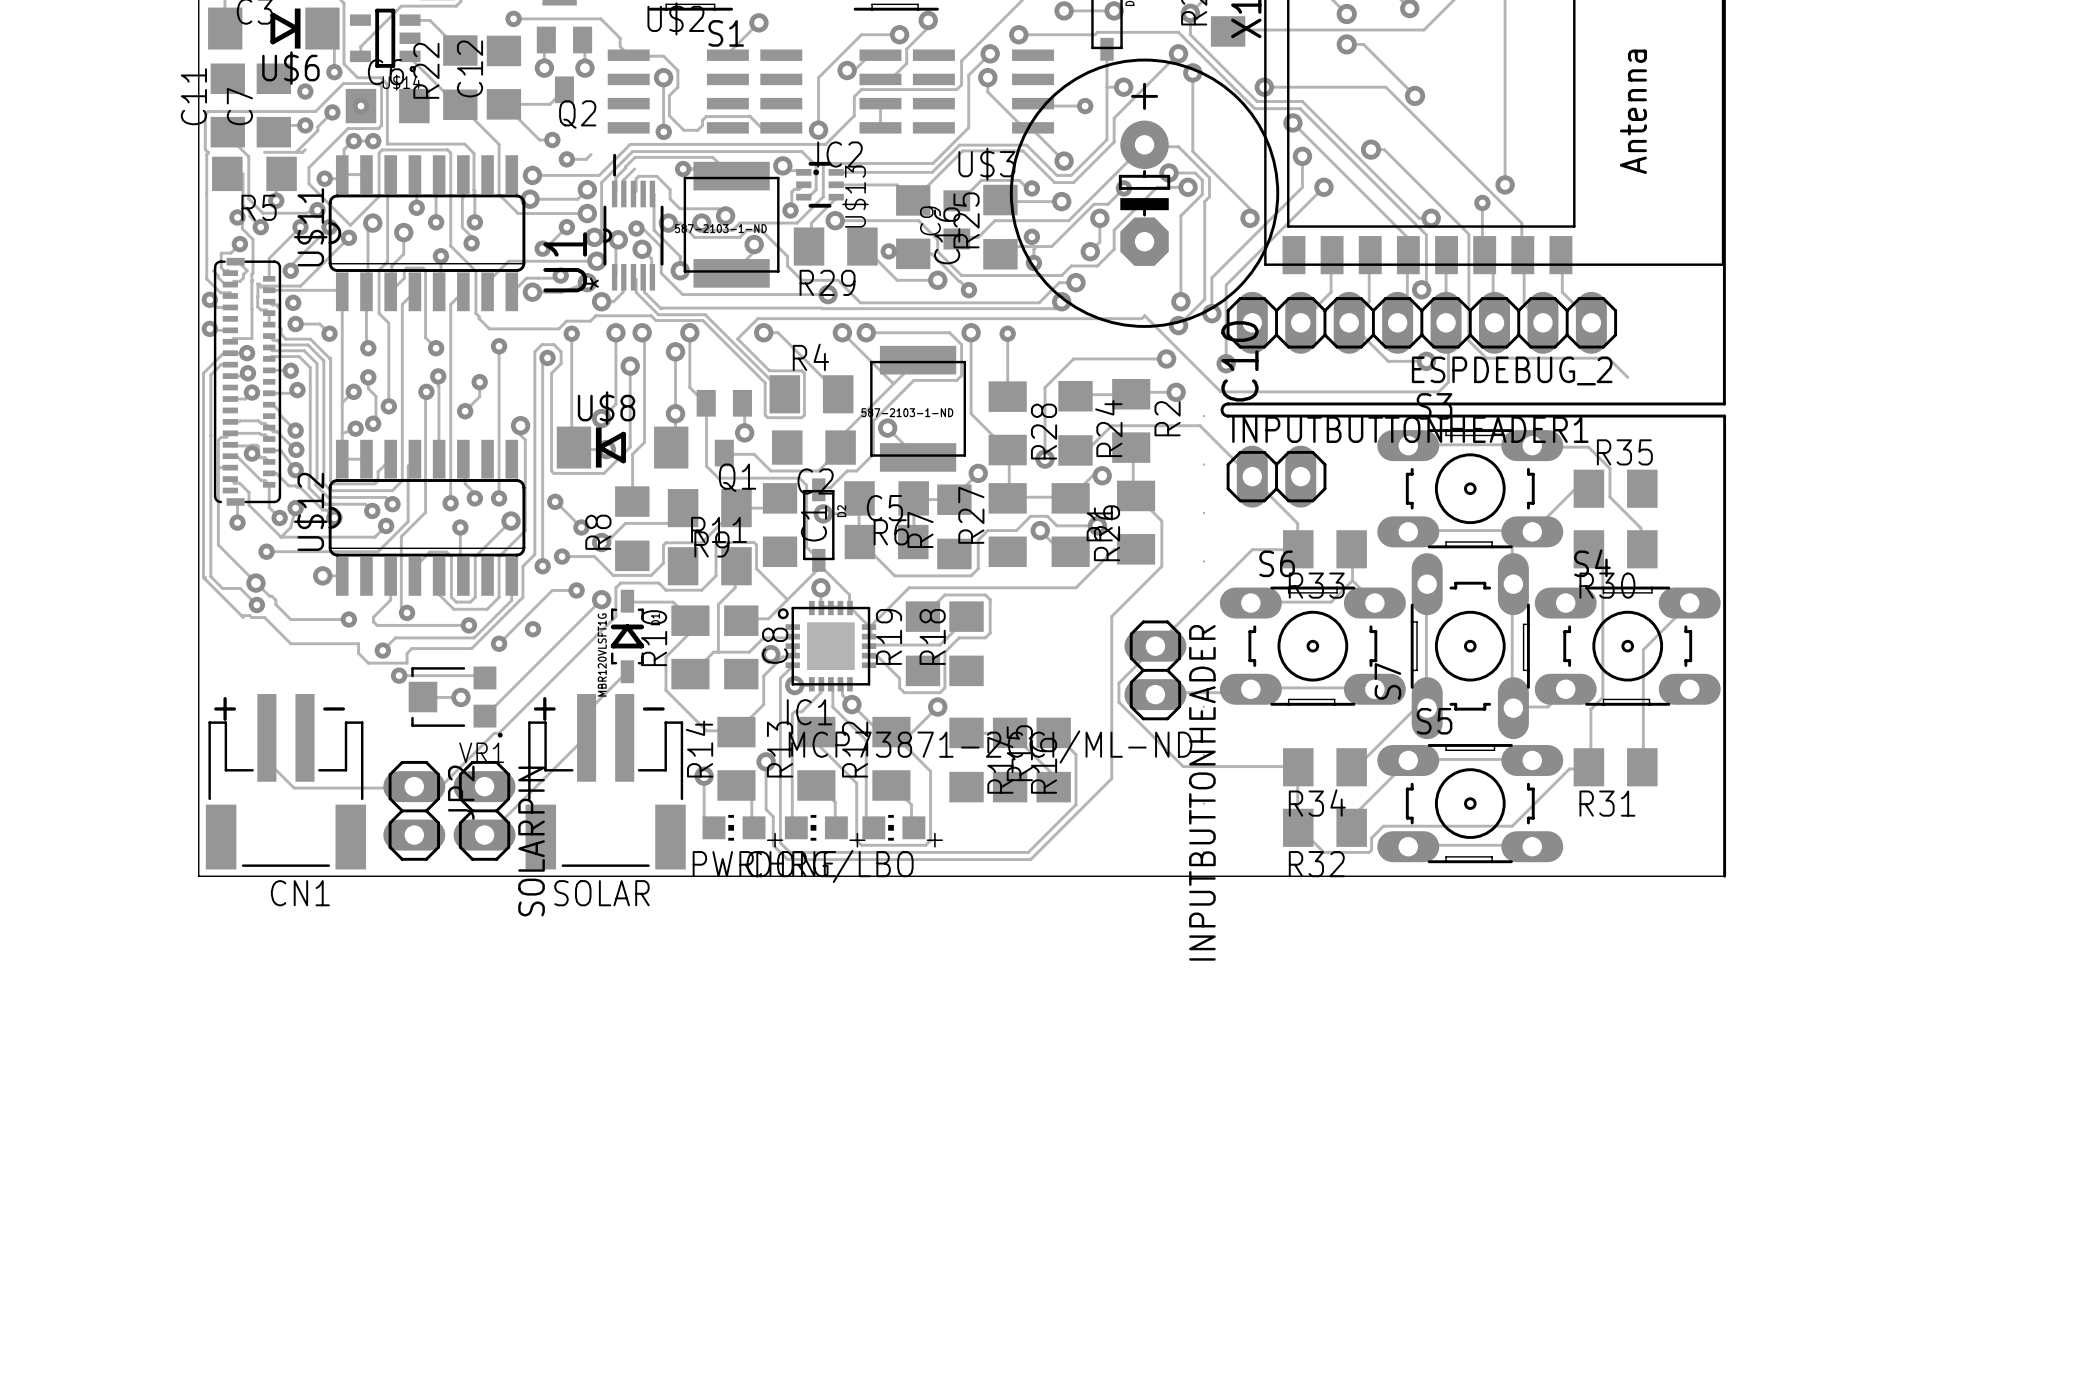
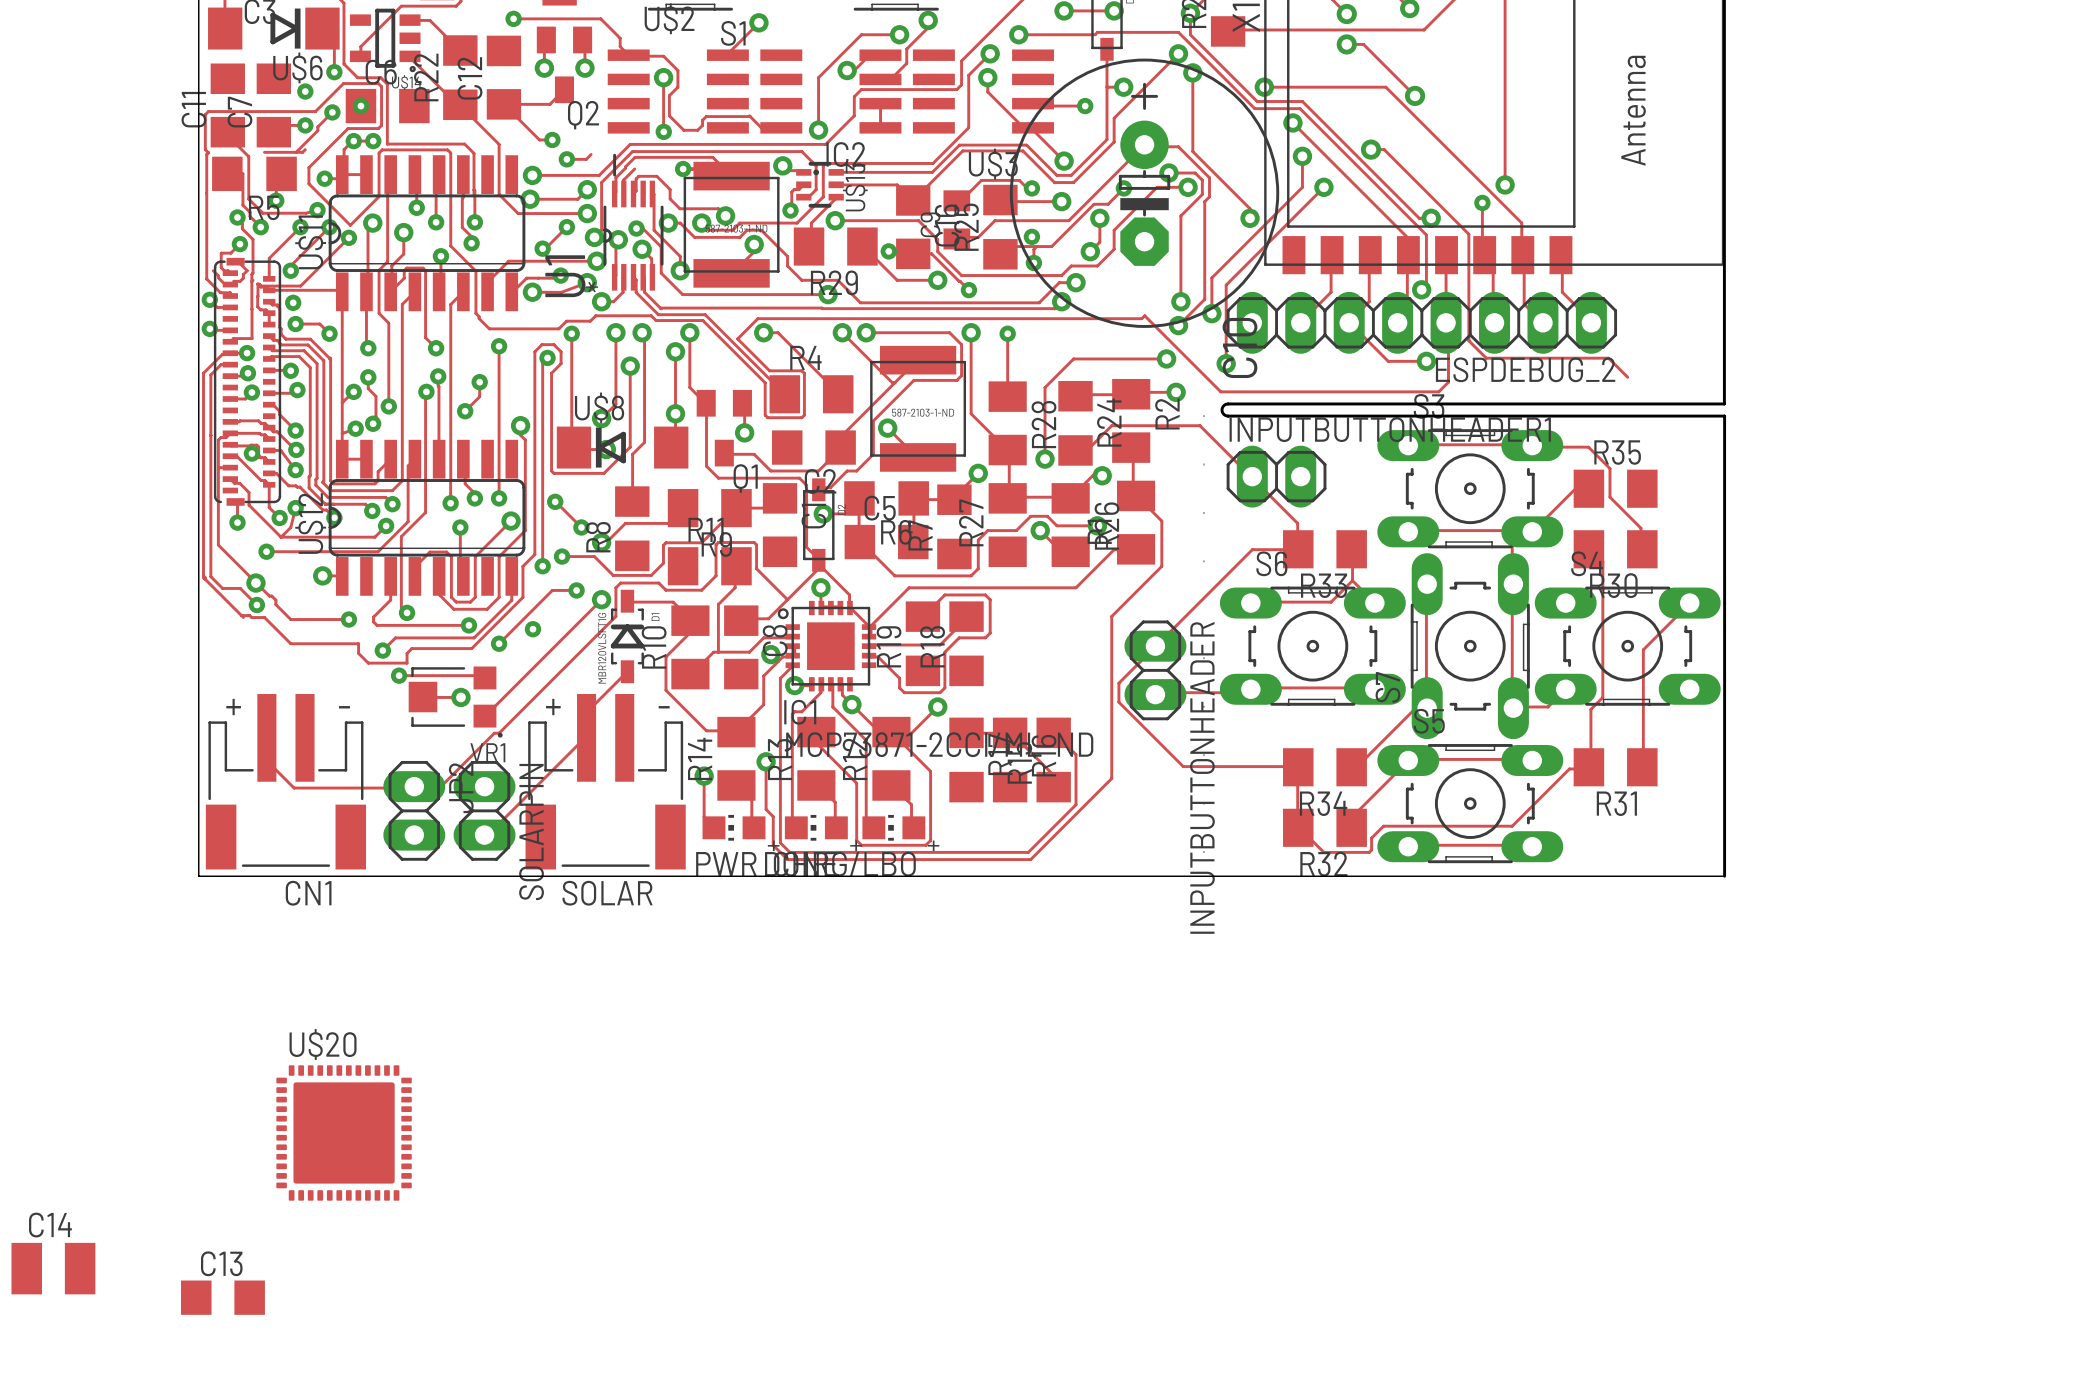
U$20: none -> (344, 1132)
C14: none -> (53, 1268)
C13: none -> (222, 1297)

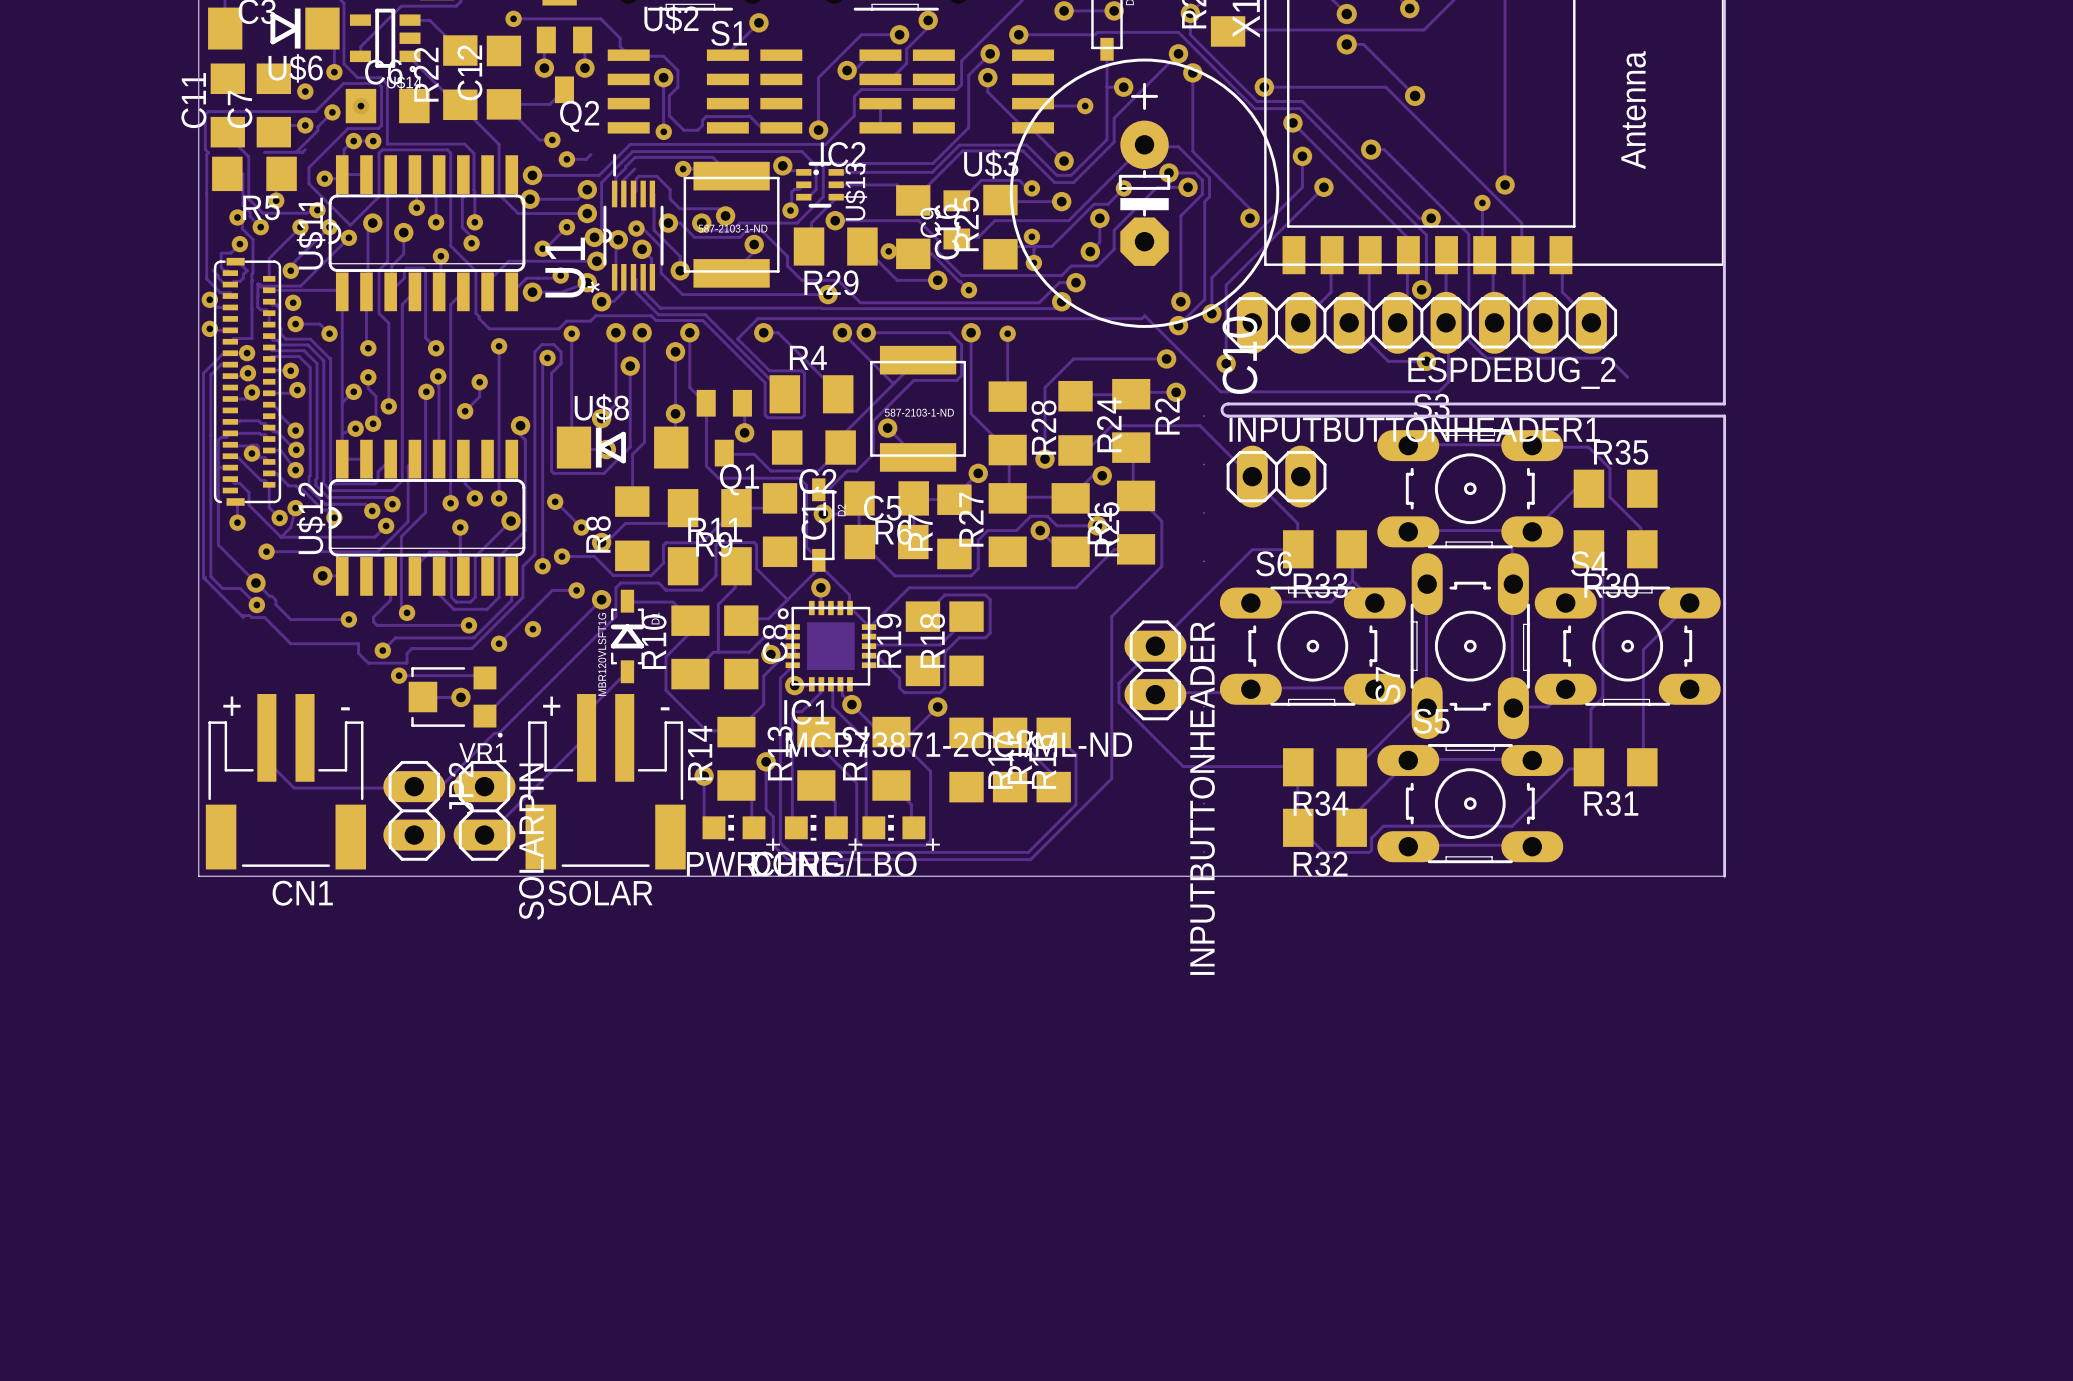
U$20: (344, 1132) -> none
C14: (53, 1268) -> none
C13: (222, 1297) -> none

